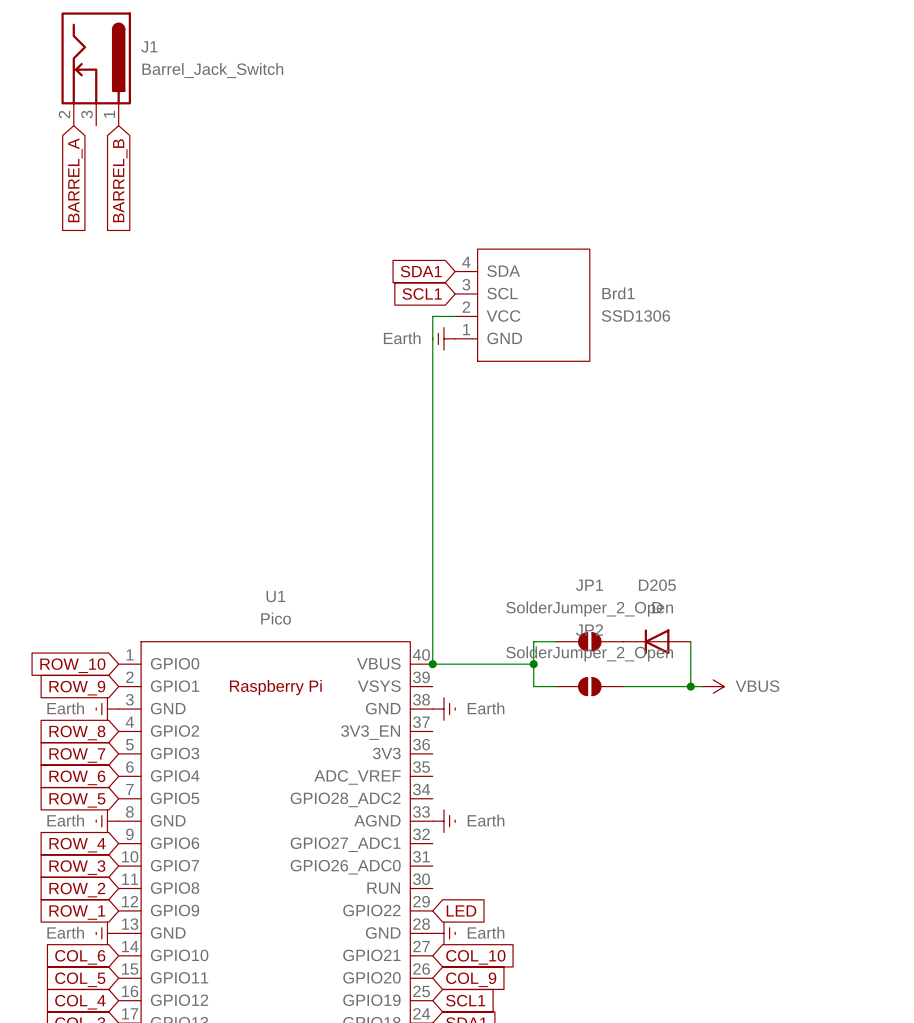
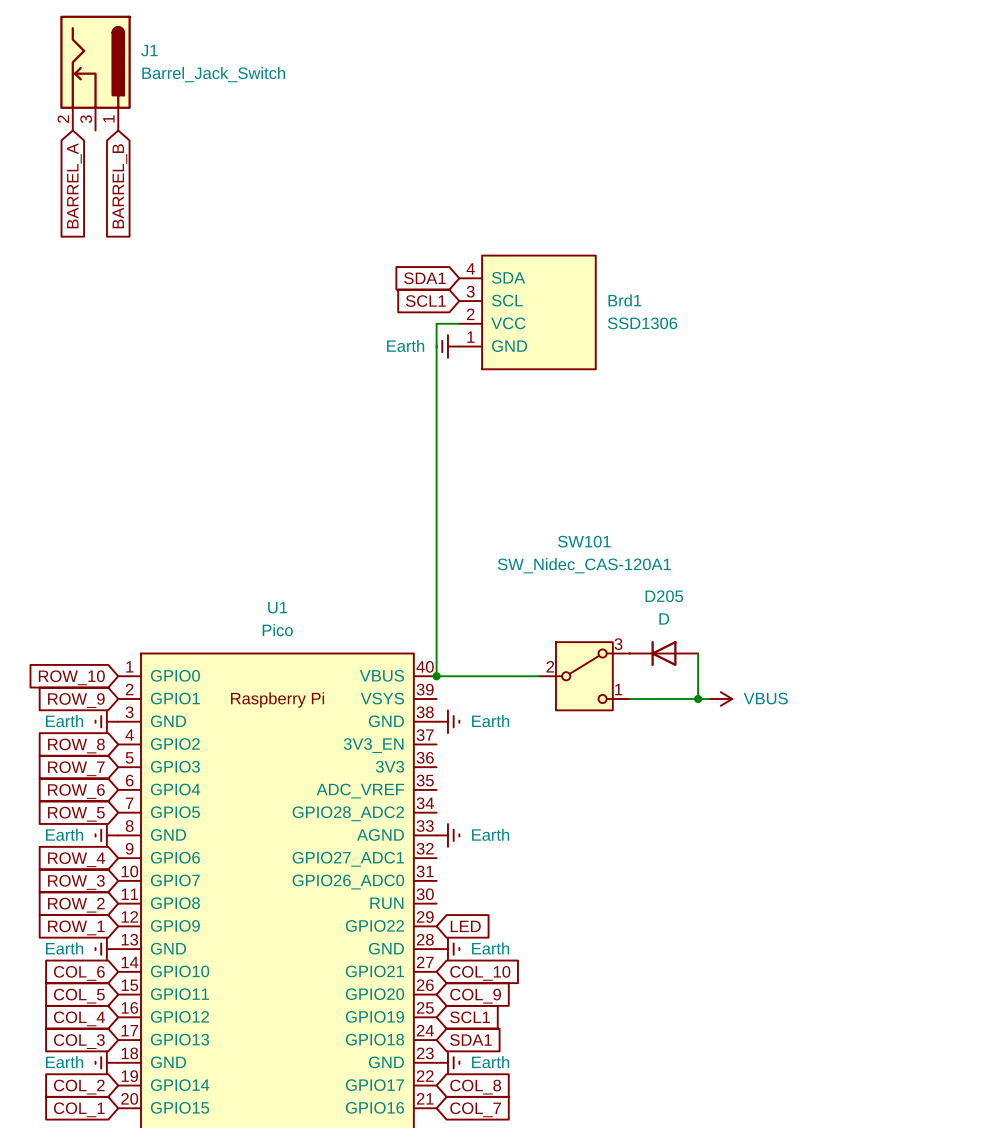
wire: (556, 641) (533, 641) (533, 686) (556, 686) -> none
JP1: SolderJumper_2_Open (589, 641) -> none
junction: (533, 664) -> none
SW101: none -> SW_Nidec_CAS-120A1 (584, 676)
JP2: SolderJumper_2_Open (589, 686) -> none

